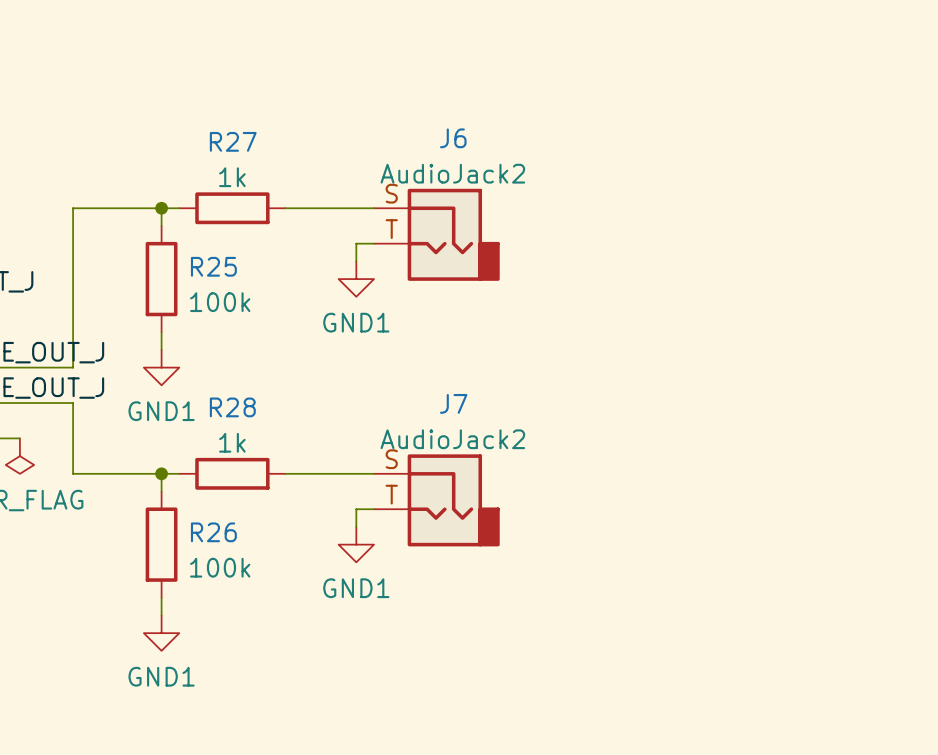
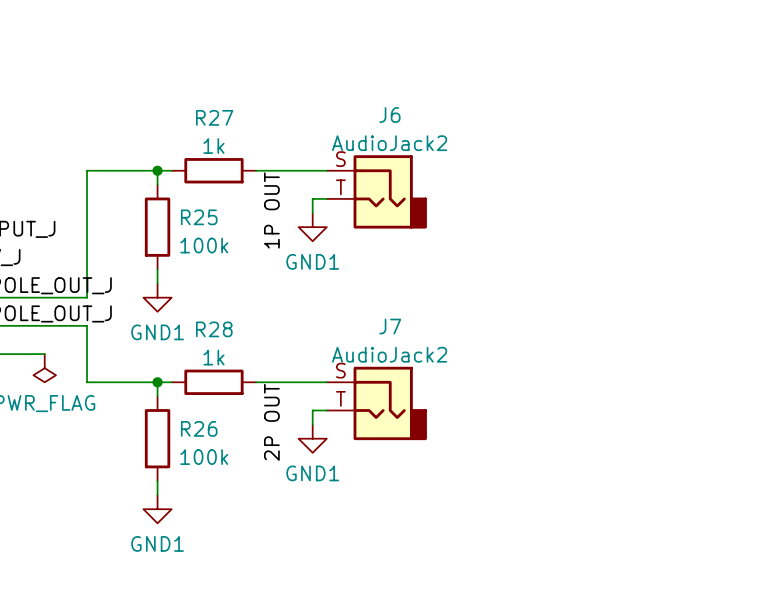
label: none -> 1P OUT (271, 210)
label: none -> 2P OUT (271, 422)

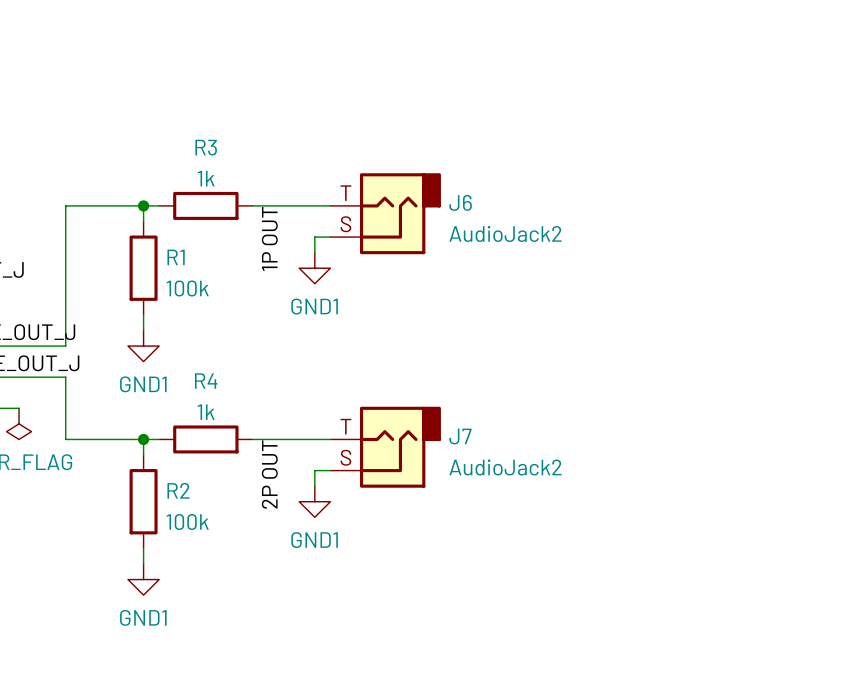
J6 name position: J6 (389, 115) -> J6 (460, 202)
R27 name: R27 (214, 117) -> R3 (206, 147)
J6 value position: AudioJack2 (389, 143) -> AudioJack2 (505, 233)
J6 flip: as is (390, 191) -> up-down (400, 213)
R25 name: R25 (199, 217) -> R1 (176, 257)
J7 name position: J7 (390, 326) -> J7 (460, 436)
R28 name: R28 (214, 329) -> R4 (206, 381)
J7 value position: AudioJack2 (389, 354) -> AudioJack2 (505, 467)
J7 flip: as is (390, 403) -> up-down (400, 447)
R26 name: R26 (199, 428) -> R2 (178, 490)

